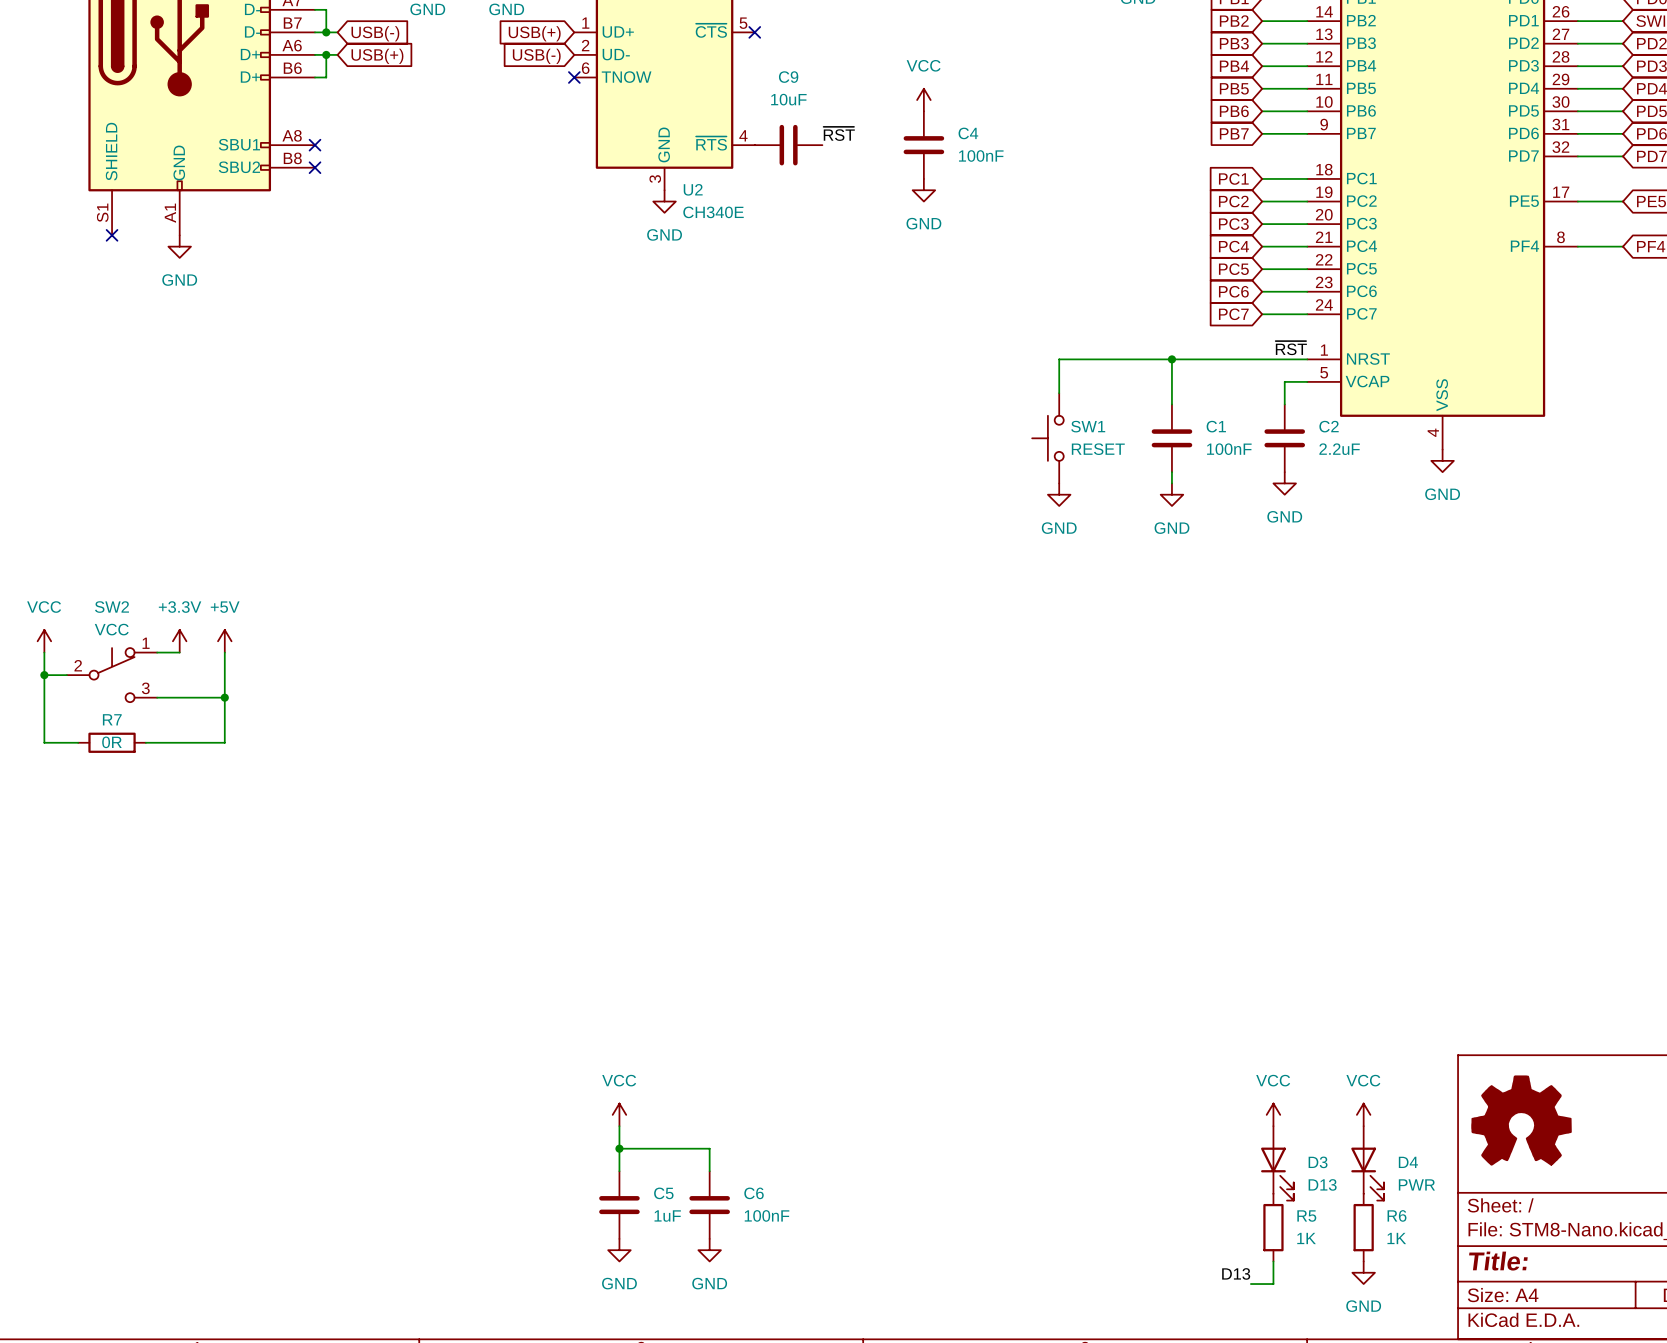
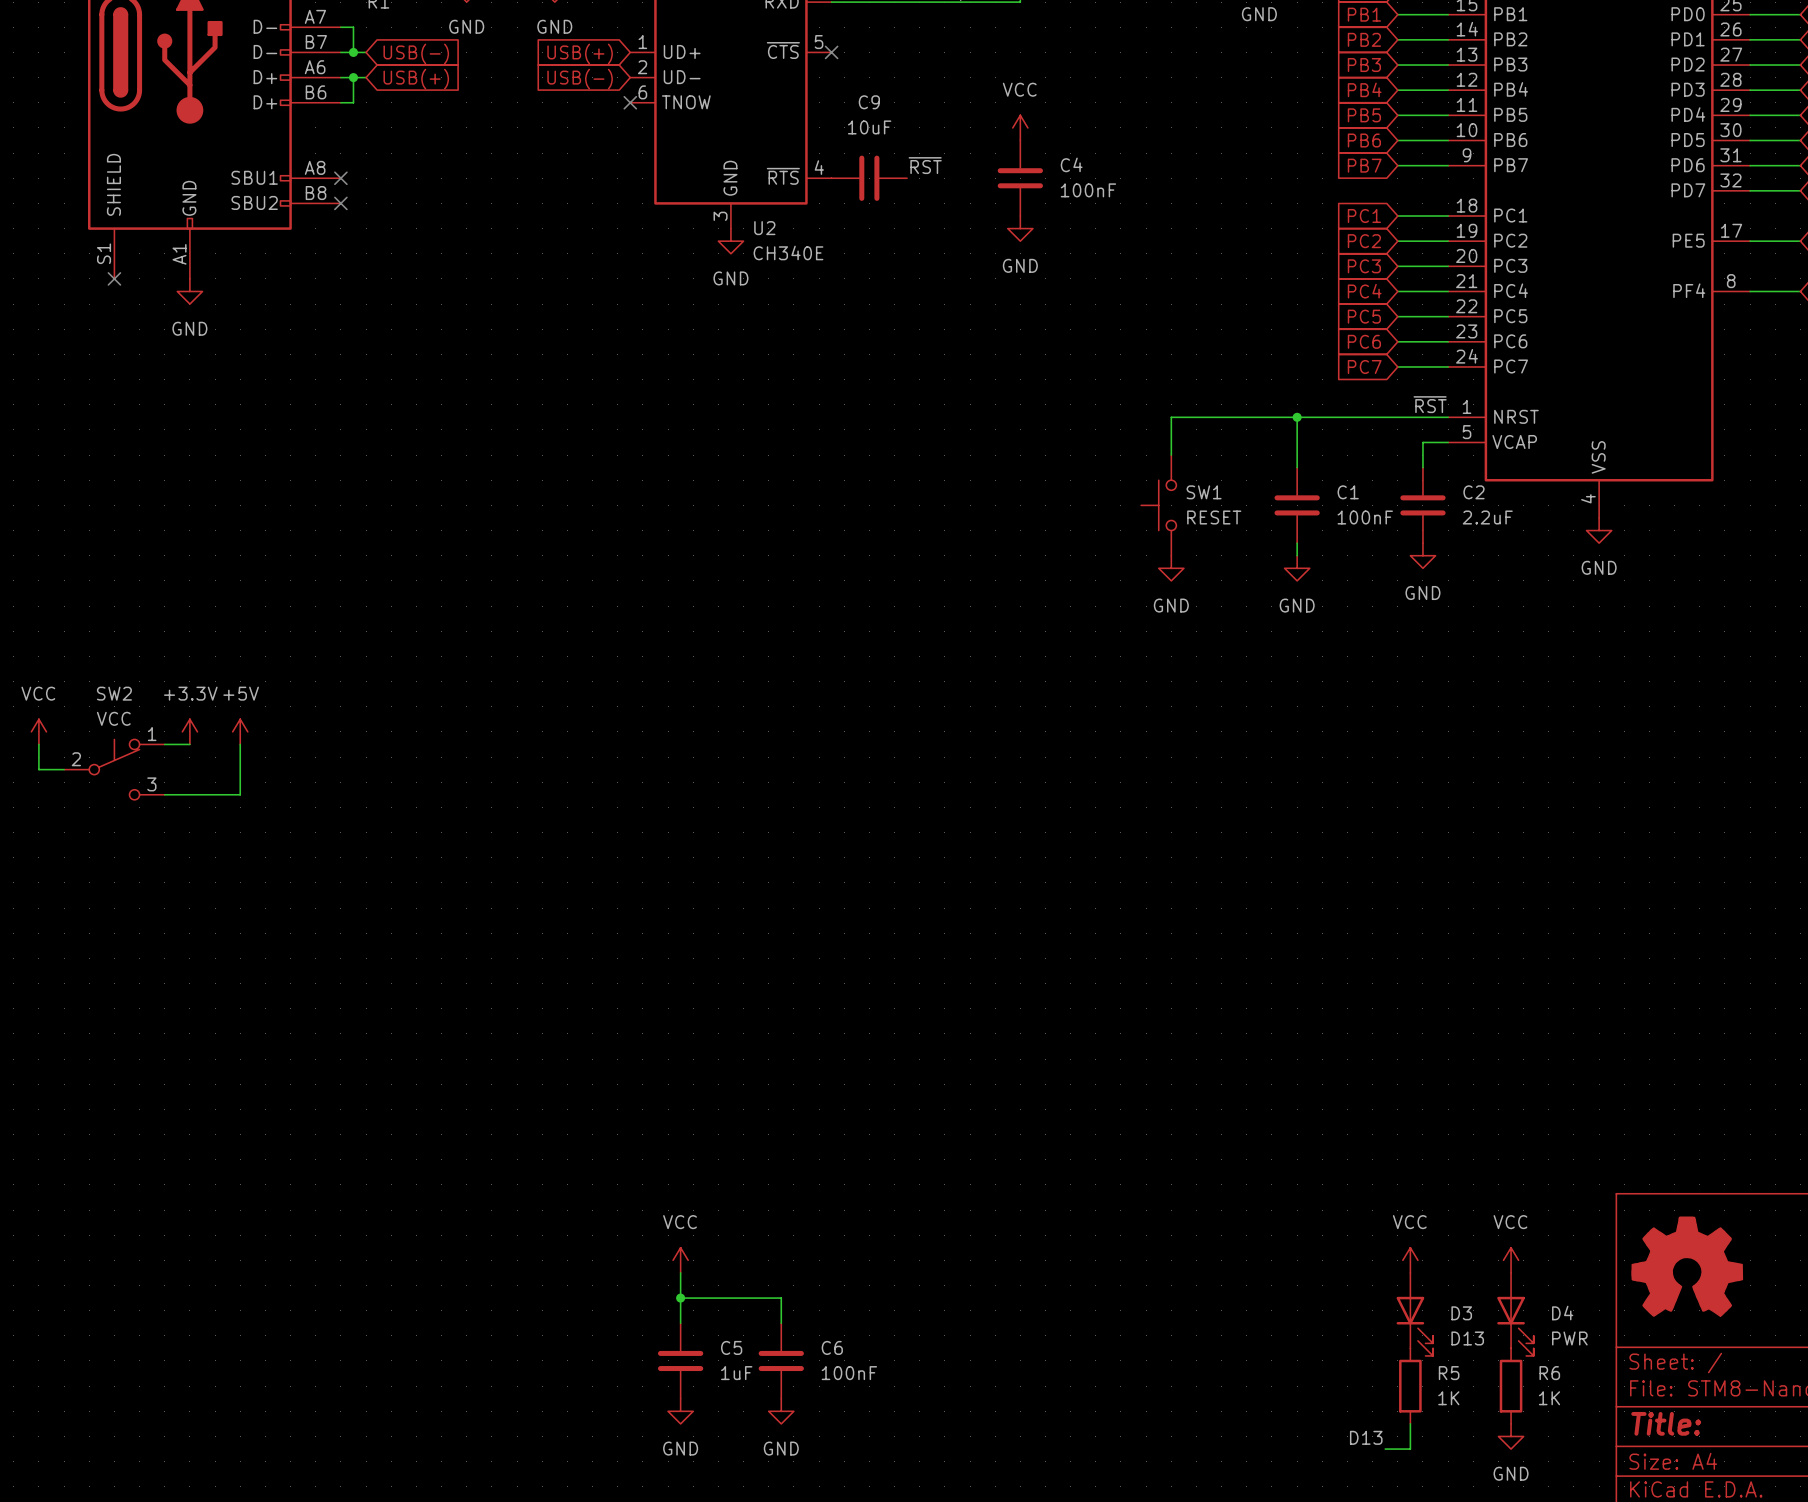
wire: (44, 675) (44, 742) (78, 742) -> none
junction: (44, 675) -> none
wire: (224, 697) (224, 742) (145, 742) -> none
junction: (224, 697) -> none
R7: 0R (112, 742) -> none

